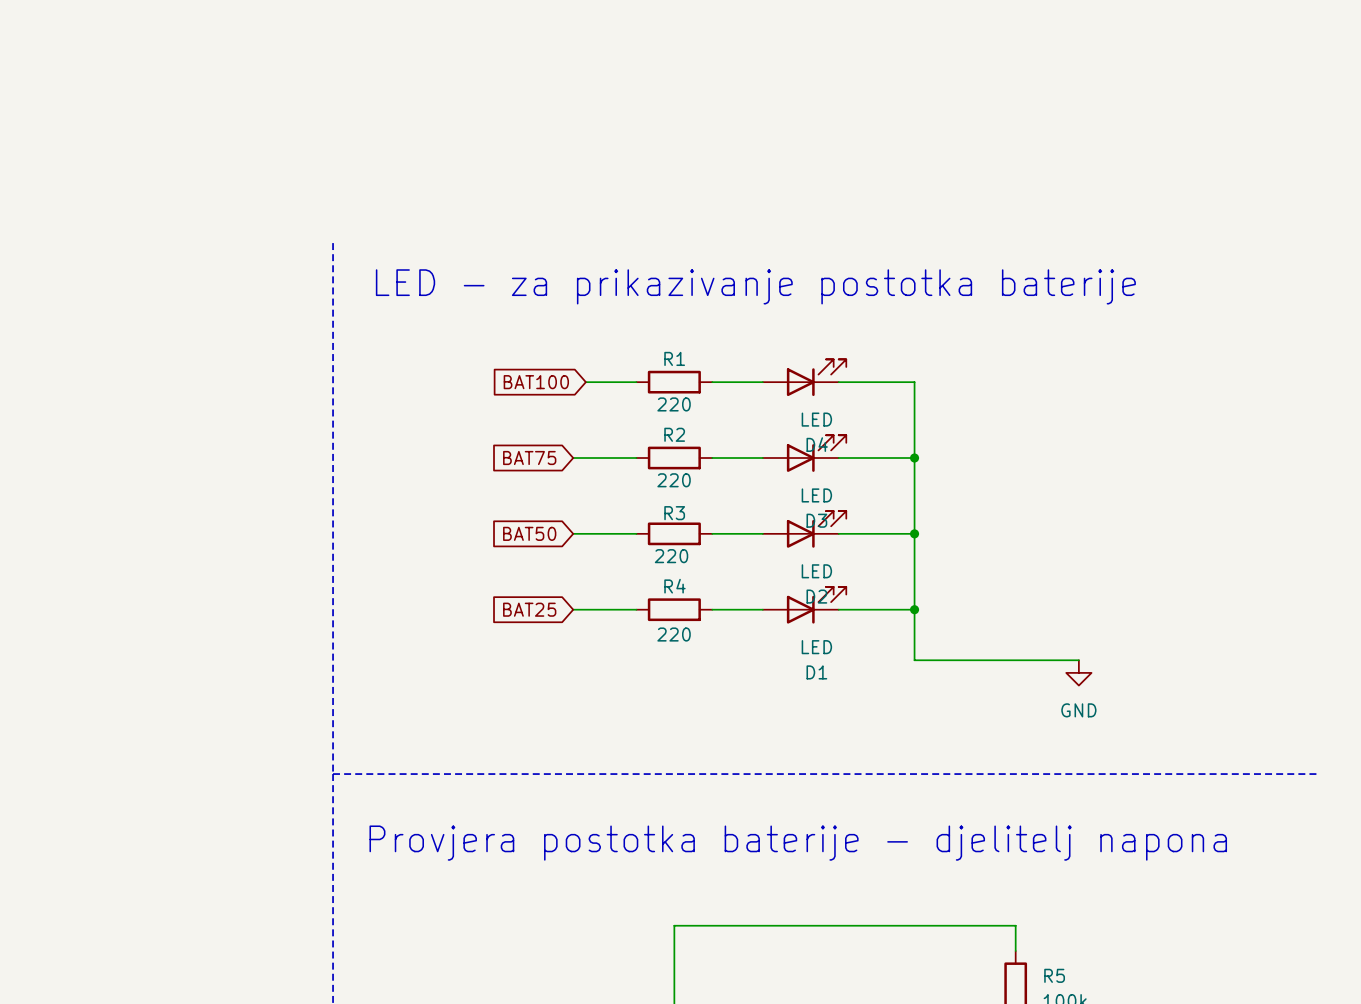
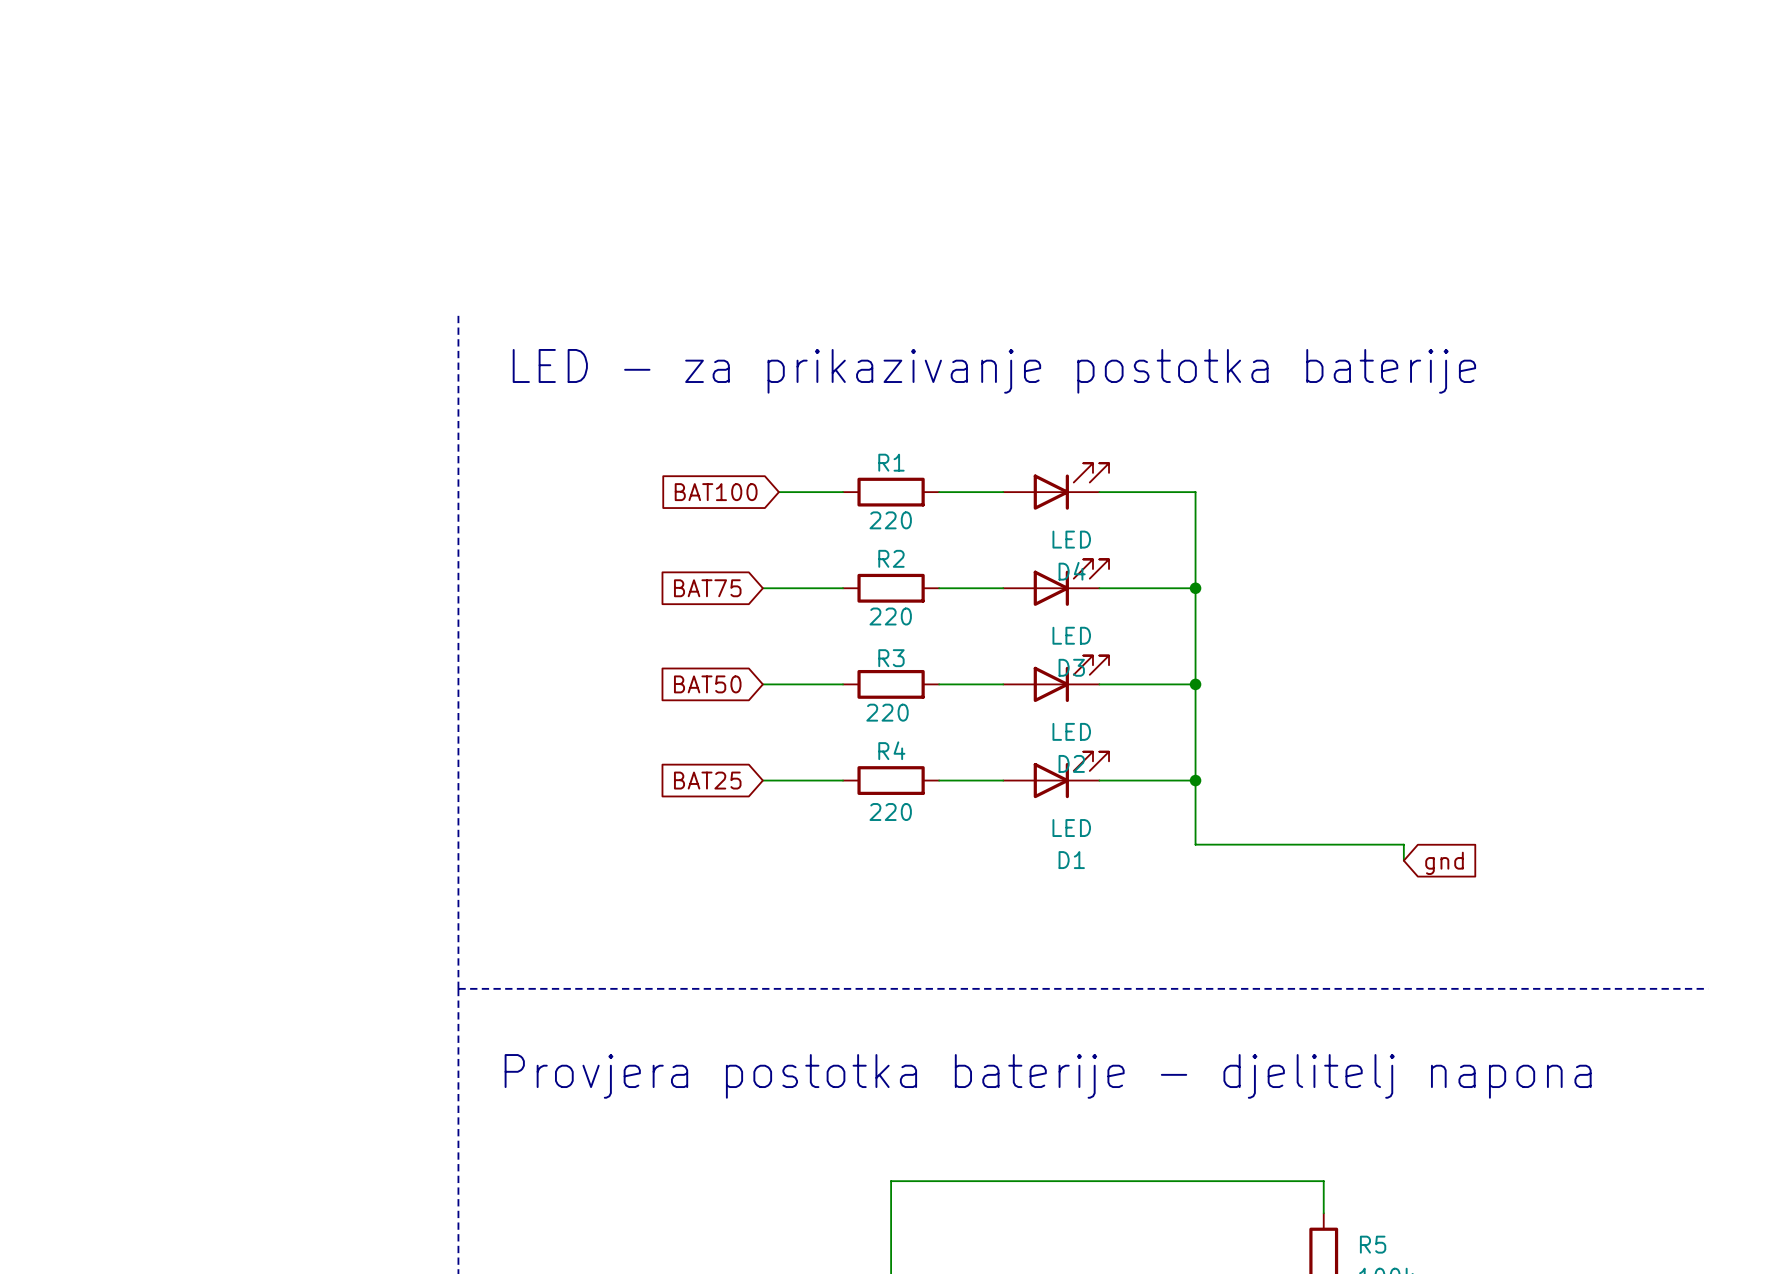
power symbol: GND (1078, 672) -> none
global label: none -> gnd (1444, 863)

